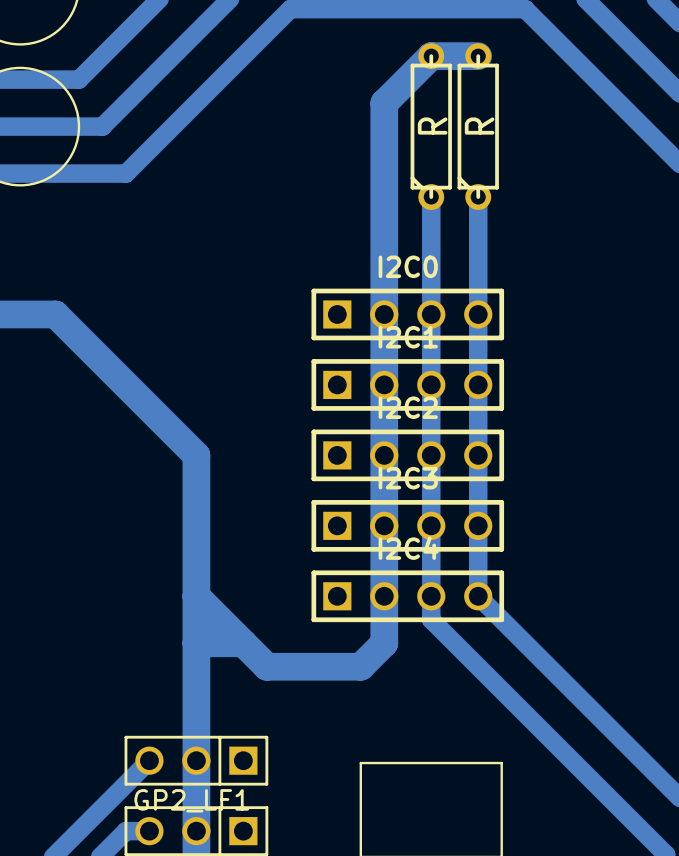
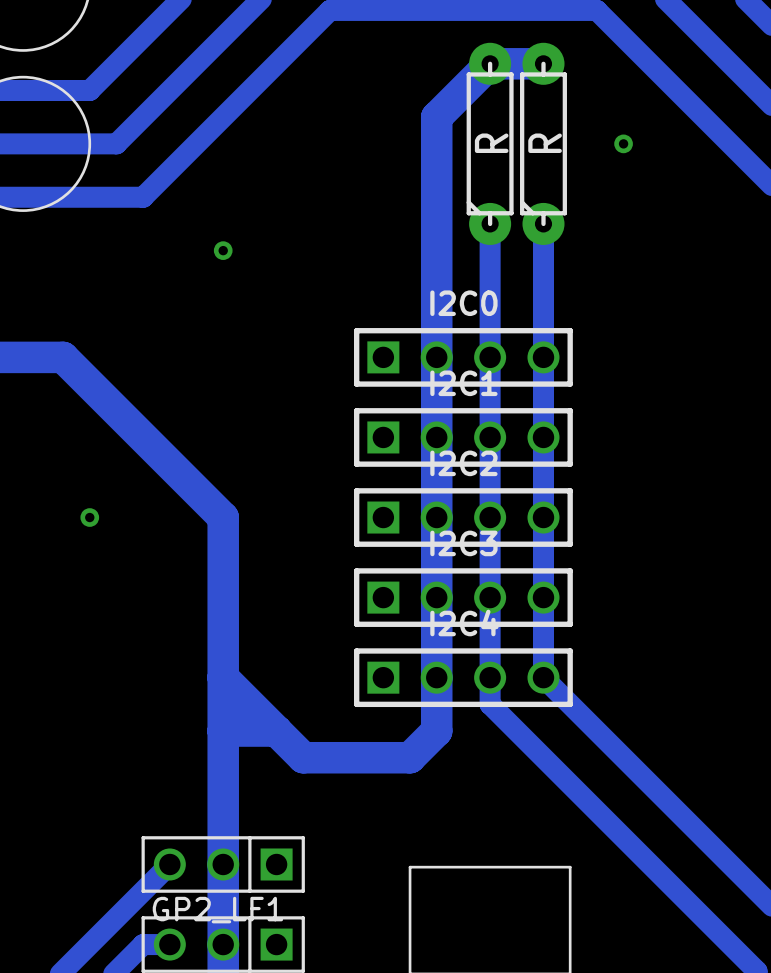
part footprint: [410, 43, 452, 210] -> [466, 42, 514, 245]
part footprint: [457, 43, 499, 210] -> [520, 42, 567, 245]
via: none -> (623, 143)
via: none -> (223, 250)
via: none -> (89, 517)

